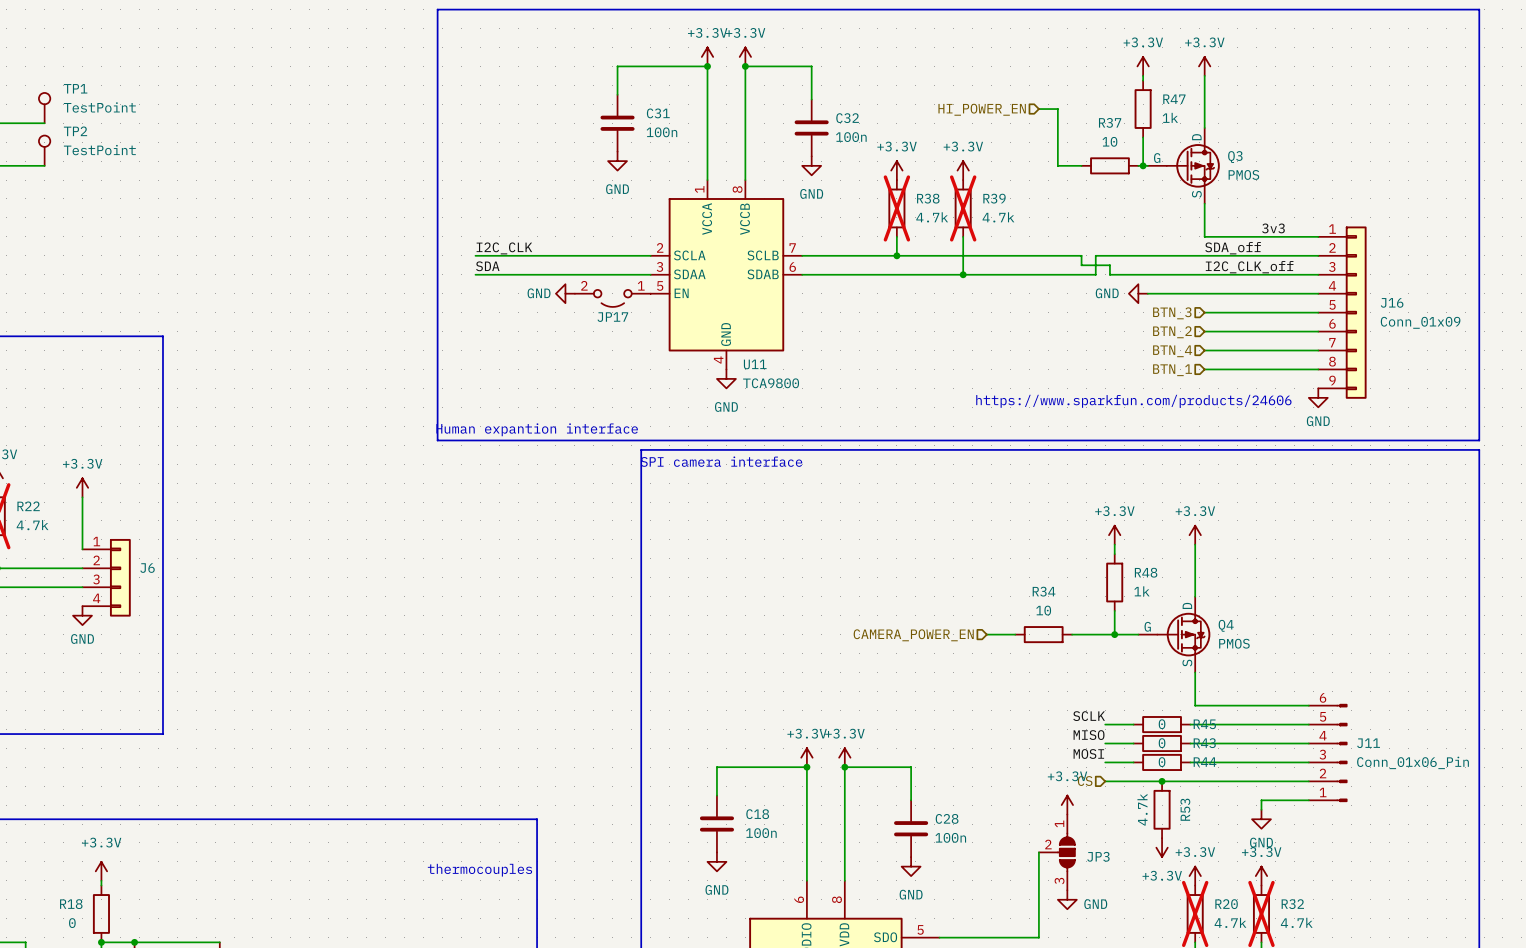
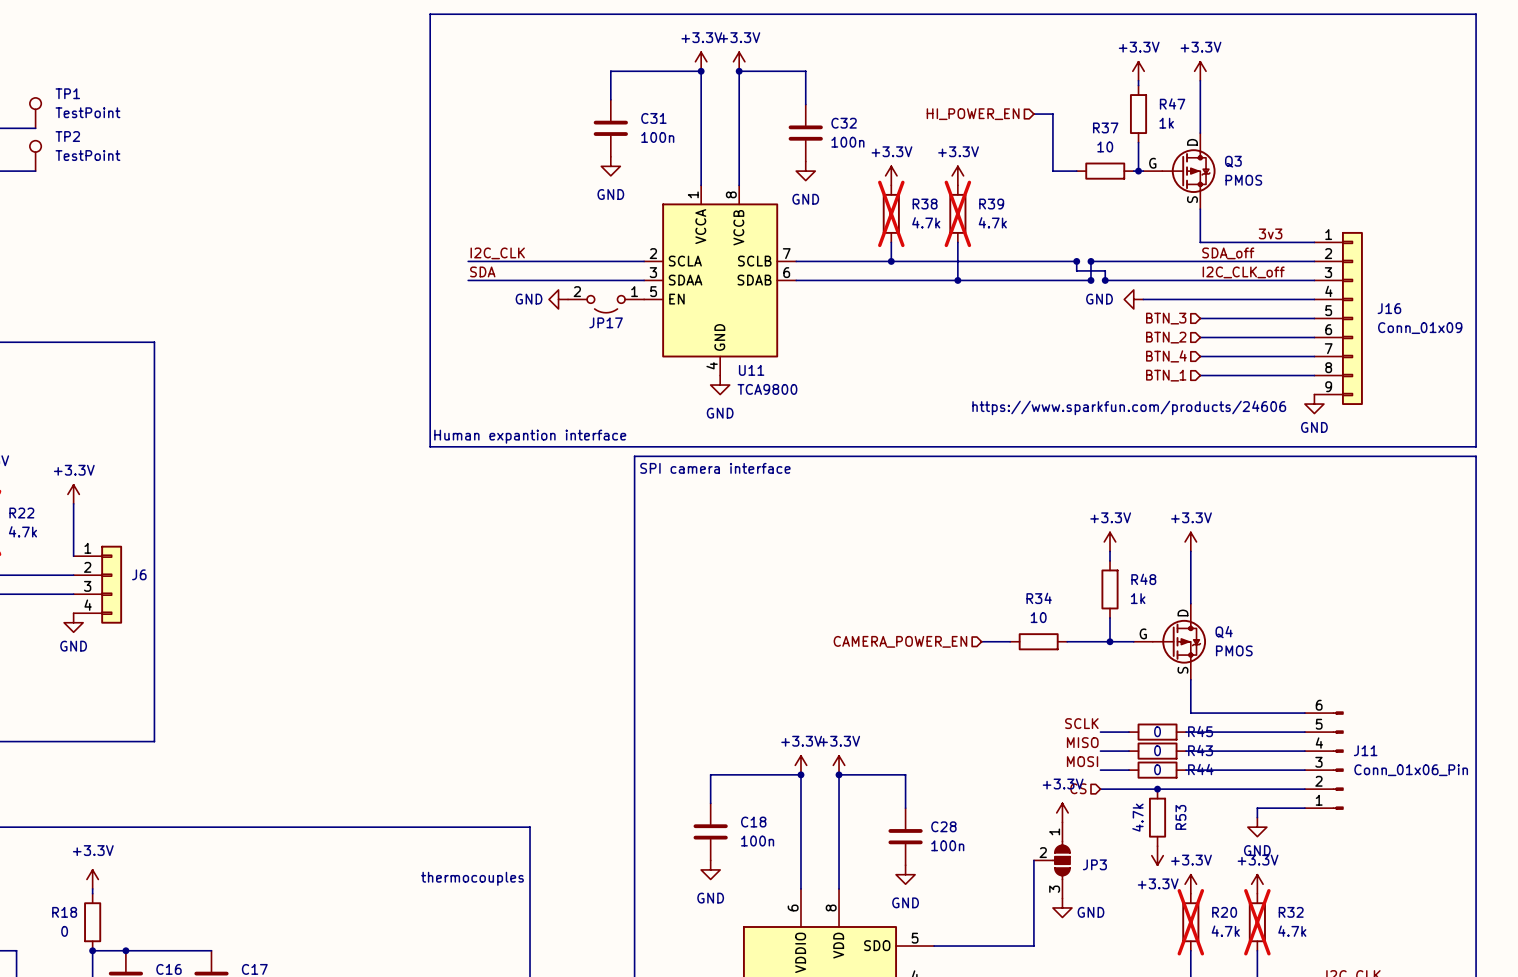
junction: none -> (1076, 261)
junction: none -> (1090, 261)
junction: none -> (1090, 280)
junction: none -> (1105, 280)

